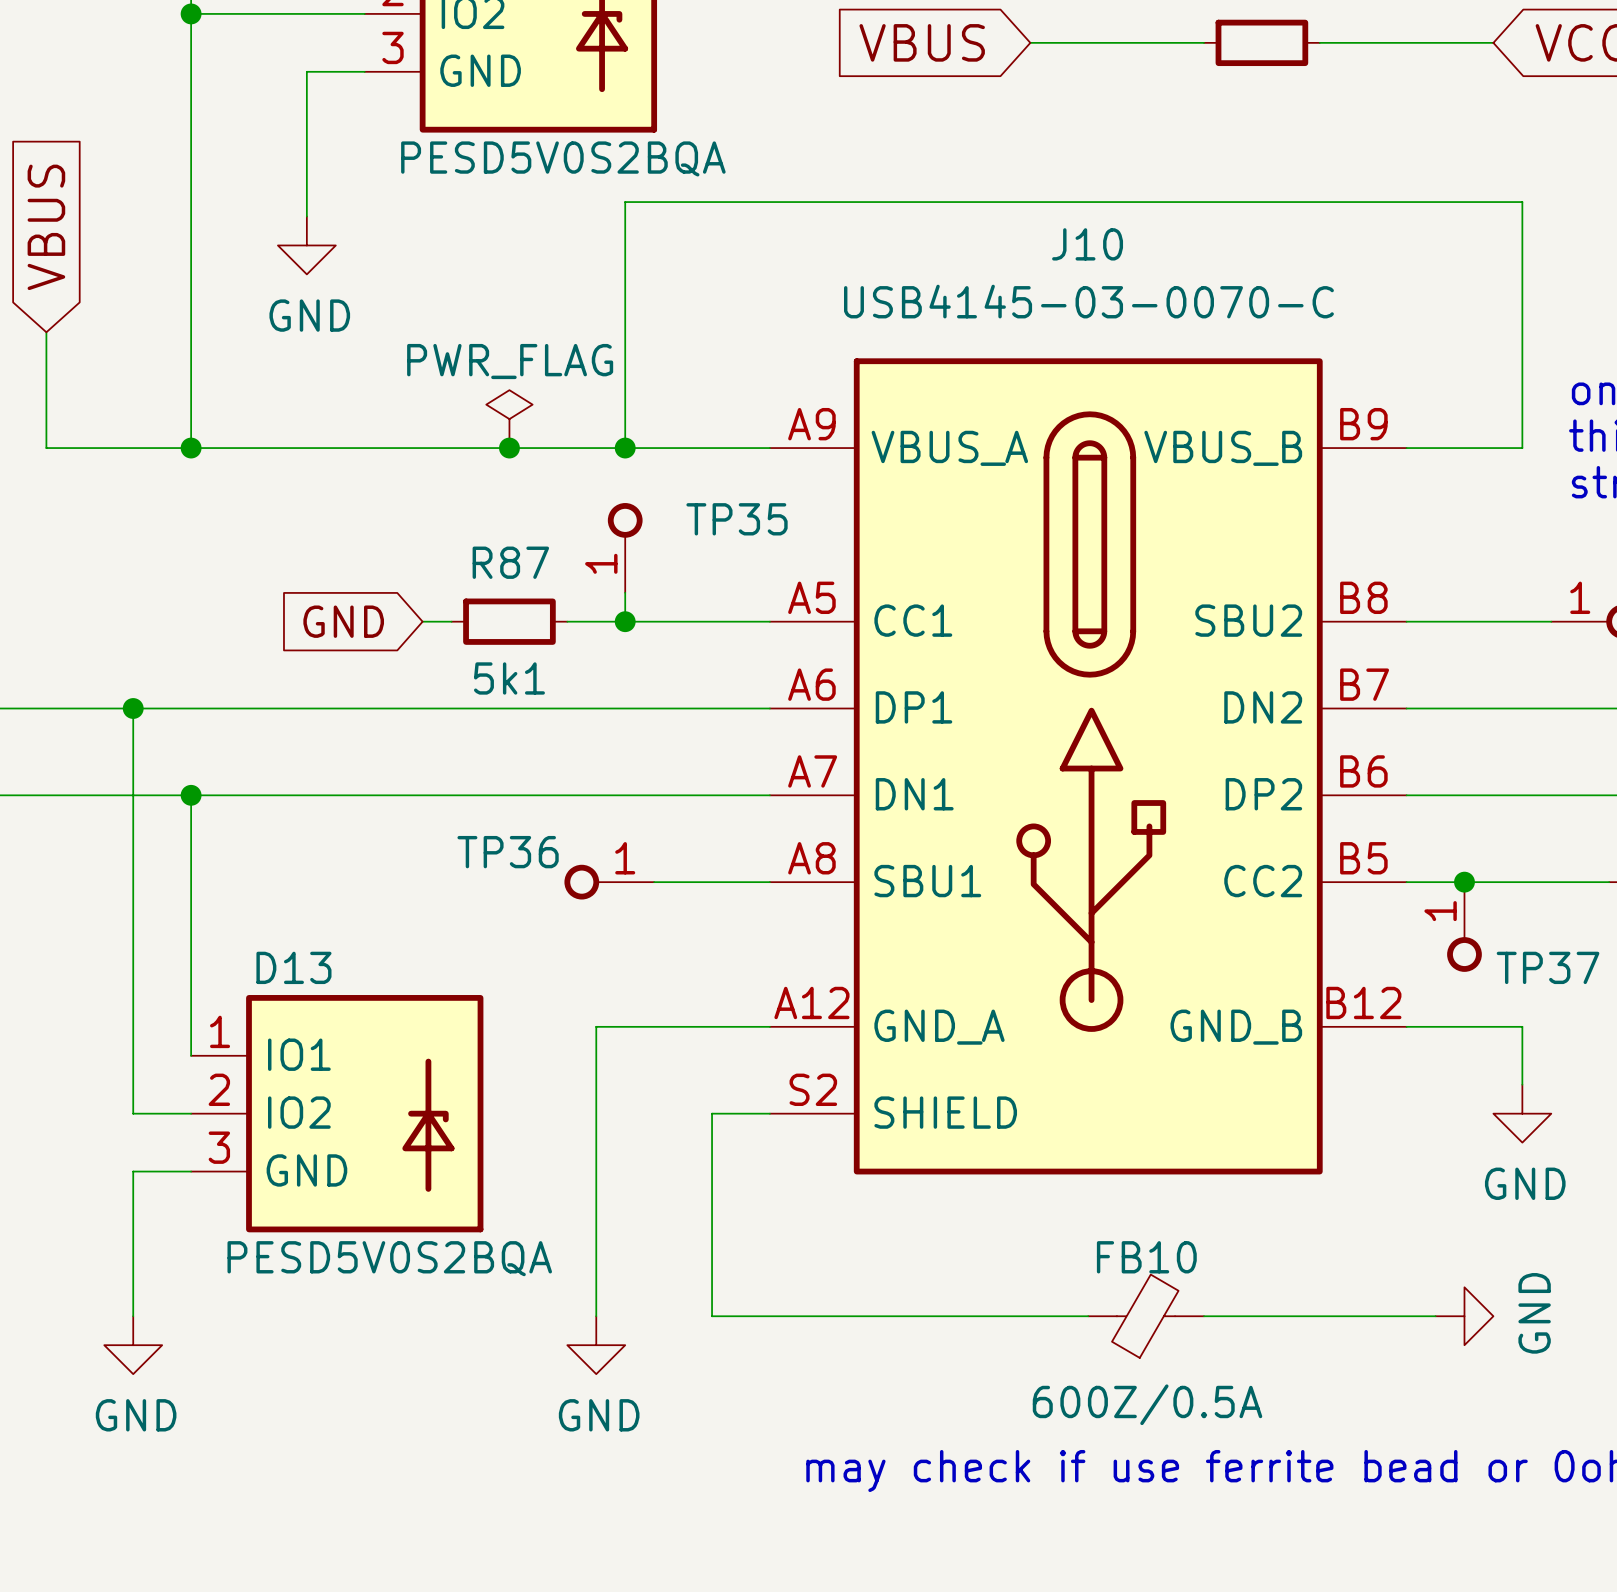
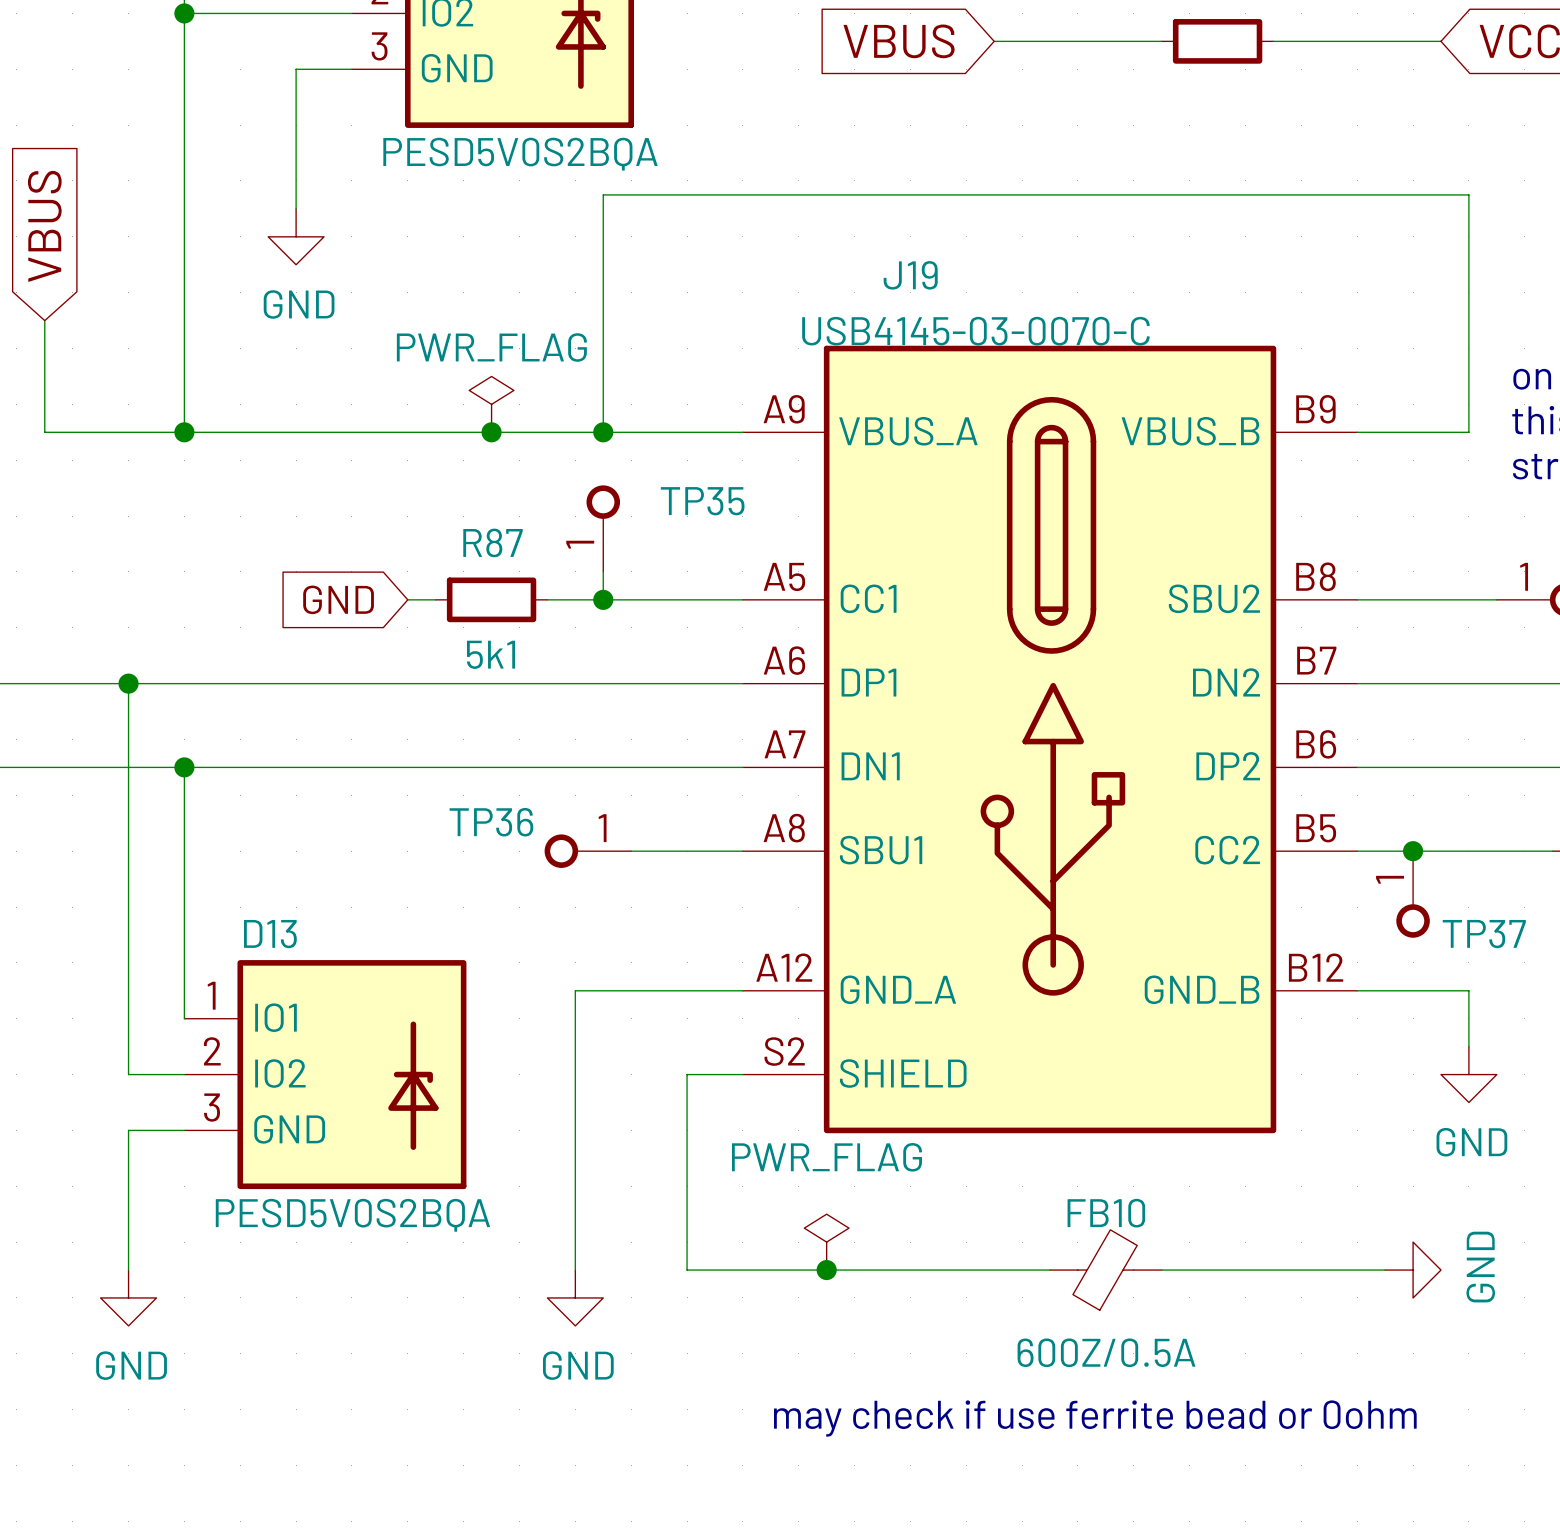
J10 name: J10 (1087, 244) -> J19 (910, 275)
J10 text position: USB4145-03-0070-C (1088, 301) -> USB4145-03-0070-C (975, 331)
power symbol: none -> PWR_FLAG (826, 1242)
junction: none -> (826, 1270)

